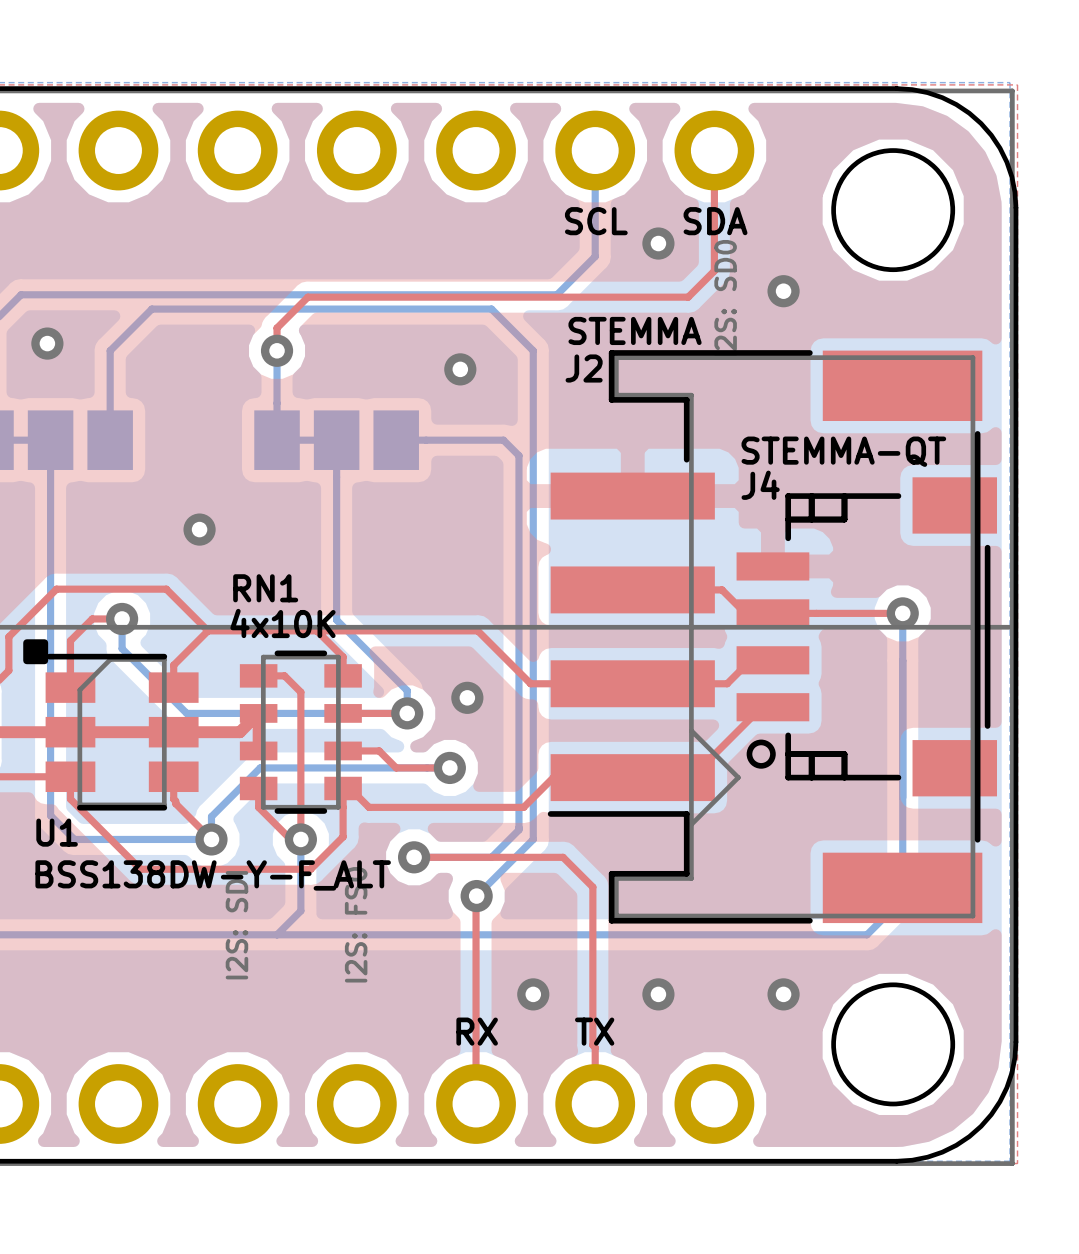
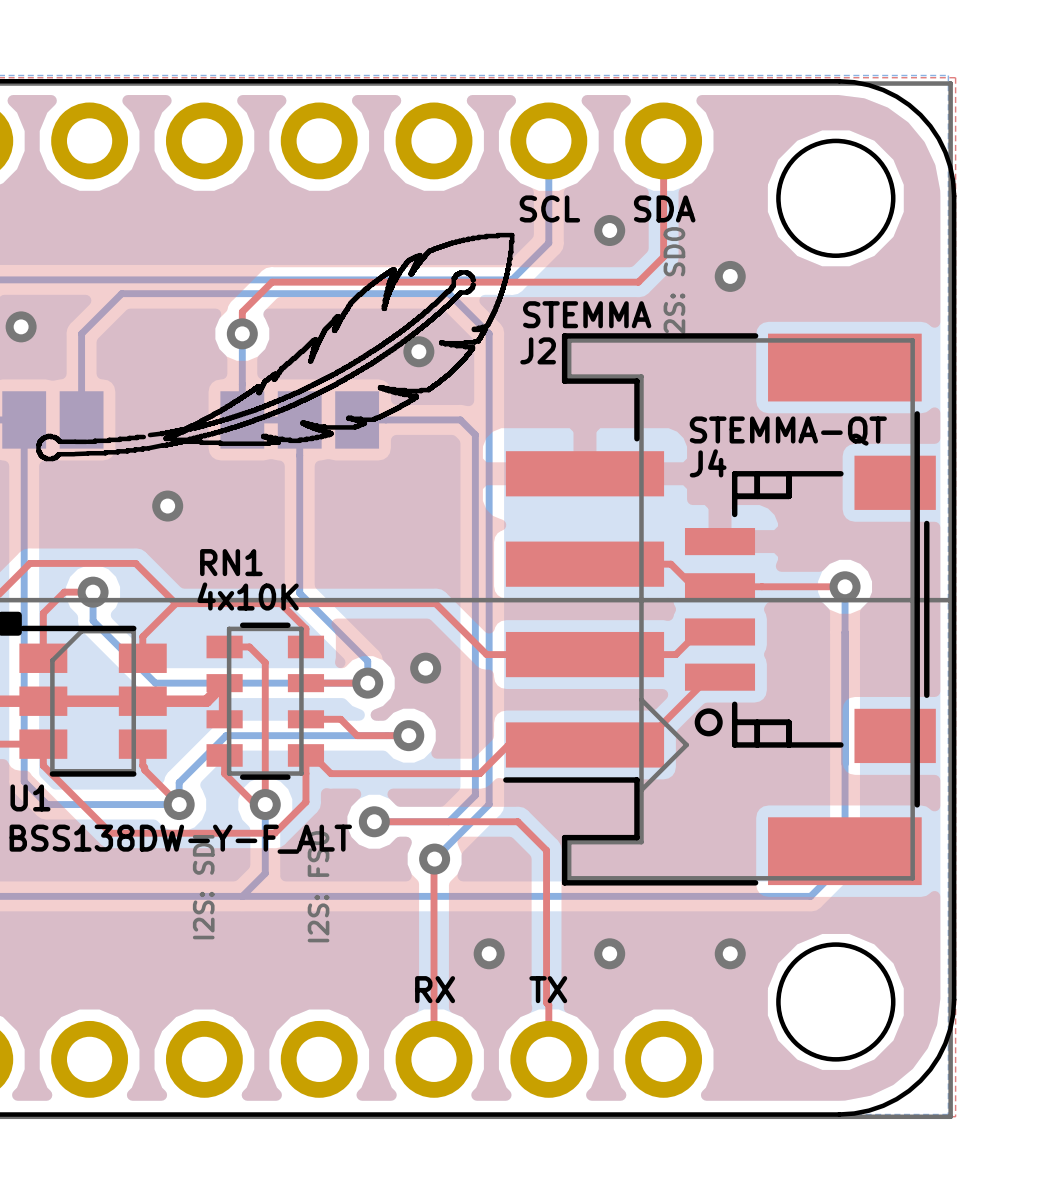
line: none -> (473, 280) (467, 272) (456, 274) (453, 278) (451, 288) (421, 316) (374, 350) (334, 373)
line: none -> (473, 284) (469, 291) (460, 292) (431, 320) (394, 348) (352, 375) (321, 392) (287, 408) (235, 427) (189, 439) (165, 438) (186, 429) (213, 423) (255, 410) (311, 386)
line: none -> (383, 305) (384, 305) (384, 308) (383, 308) (383, 305)
line: none -> (473, 328) (486, 326) (495, 309) (507, 274) (512, 235) (472, 237) (434, 248) (425, 255) (414, 270) (413, 271) (411, 271) (411, 274) (410, 273) (412, 273) (412, 269) (420, 255) (408, 259) (393, 281) (385, 304) (385, 295) (394, 269) (370, 284) (350, 303) (337, 327) (336, 328) (334, 328) (335, 330) (335, 326) (338, 316) (334, 319) (324, 329) (313, 356) (311, 356) (312, 358) (312, 352) (315, 339) (281, 368) (274, 379) (275, 373) (265, 380) (259, 392) (259, 386) (257, 386) (230, 405) (194, 425) (161, 434)
line: none -> (473, 329) (485, 328) (478, 341) (445, 343) (472, 347) (472, 348) (443, 378)
line: none -> (443, 342) (441, 342) (443, 343)
line: none -> (311, 360) (311, 361)
line: none -> (334, 374) (311, 385)
line: none -> (443, 379) (428, 390) (421, 391) (394, 390) (394, 389) (387, 388) (380, 388) (380, 387) (382, 387) (382, 389) (395, 392) (416, 395) (416, 397) (374, 419) (352, 418) (364, 422) (355, 427) (324, 427) (308, 423) (302, 423) (302, 422) (304, 422) (304, 424) (313, 428) (331, 433) (321, 437) (290, 440) (271, 437) (263, 437) (263, 436) (266, 436) (266, 437) (277, 440) (278, 442) (220, 443) (181, 441) (162, 445)
line: none -> (348, 417) (348, 418) (351, 418) (351, 417) (348, 417)
line: none -> (161, 433) (149, 435)
line: none -> (143, 437) (88, 441)
line: none -> (74, 441) (59, 441) (56, 437) (48, 436) (43, 437) (38, 444) (40, 455) (46, 458) (55, 458) (58, 454) (73, 454)
line: none -> (75, 441) (86, 441)
line: none -> (162, 445) (149, 448)
line: none -> (148, 448) (88, 453)
line: none -> (87, 453) (74, 454)

